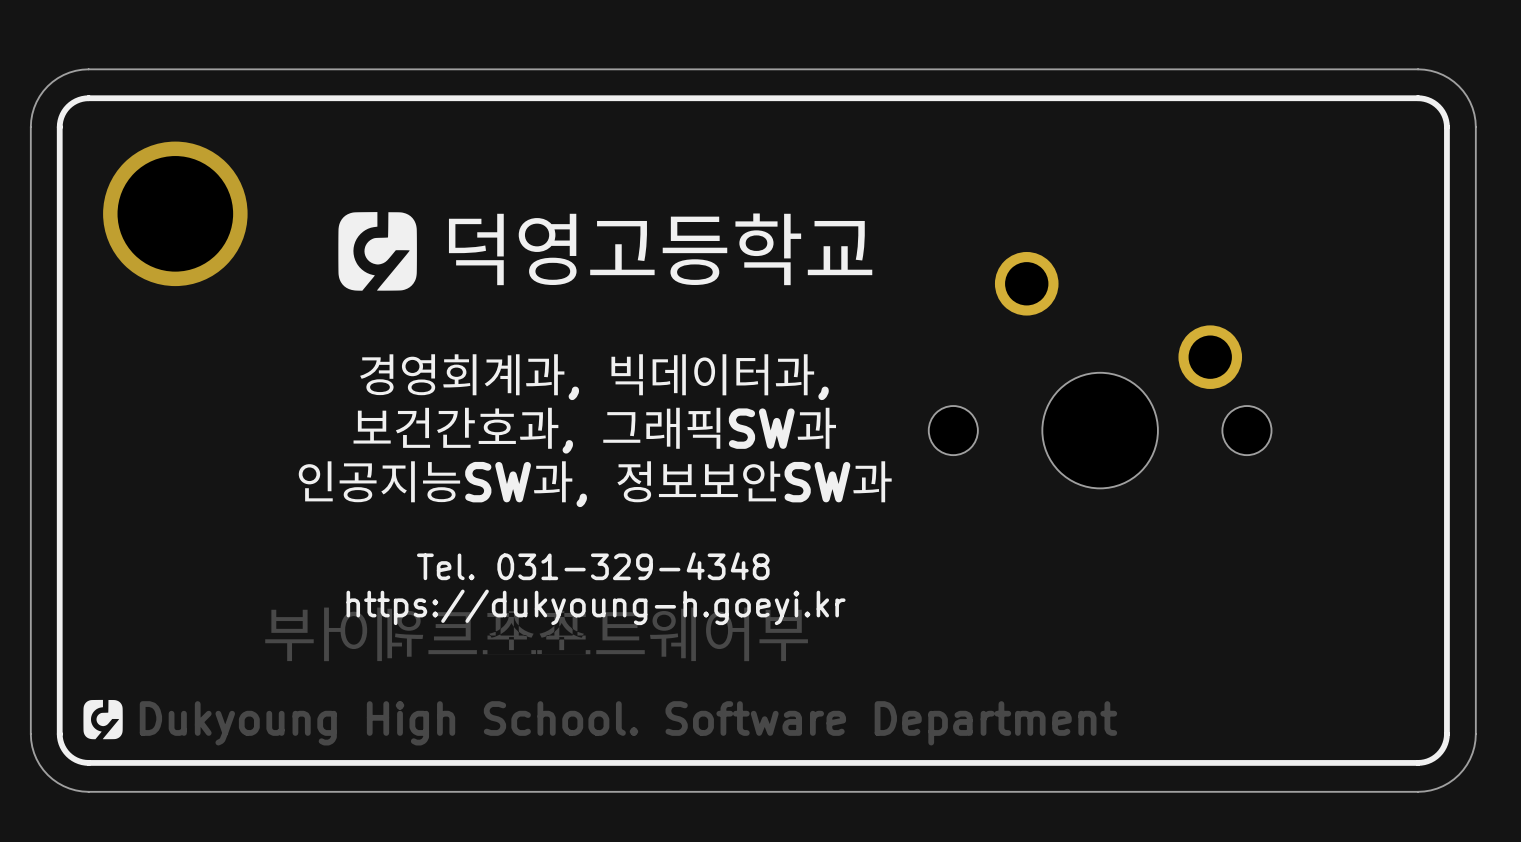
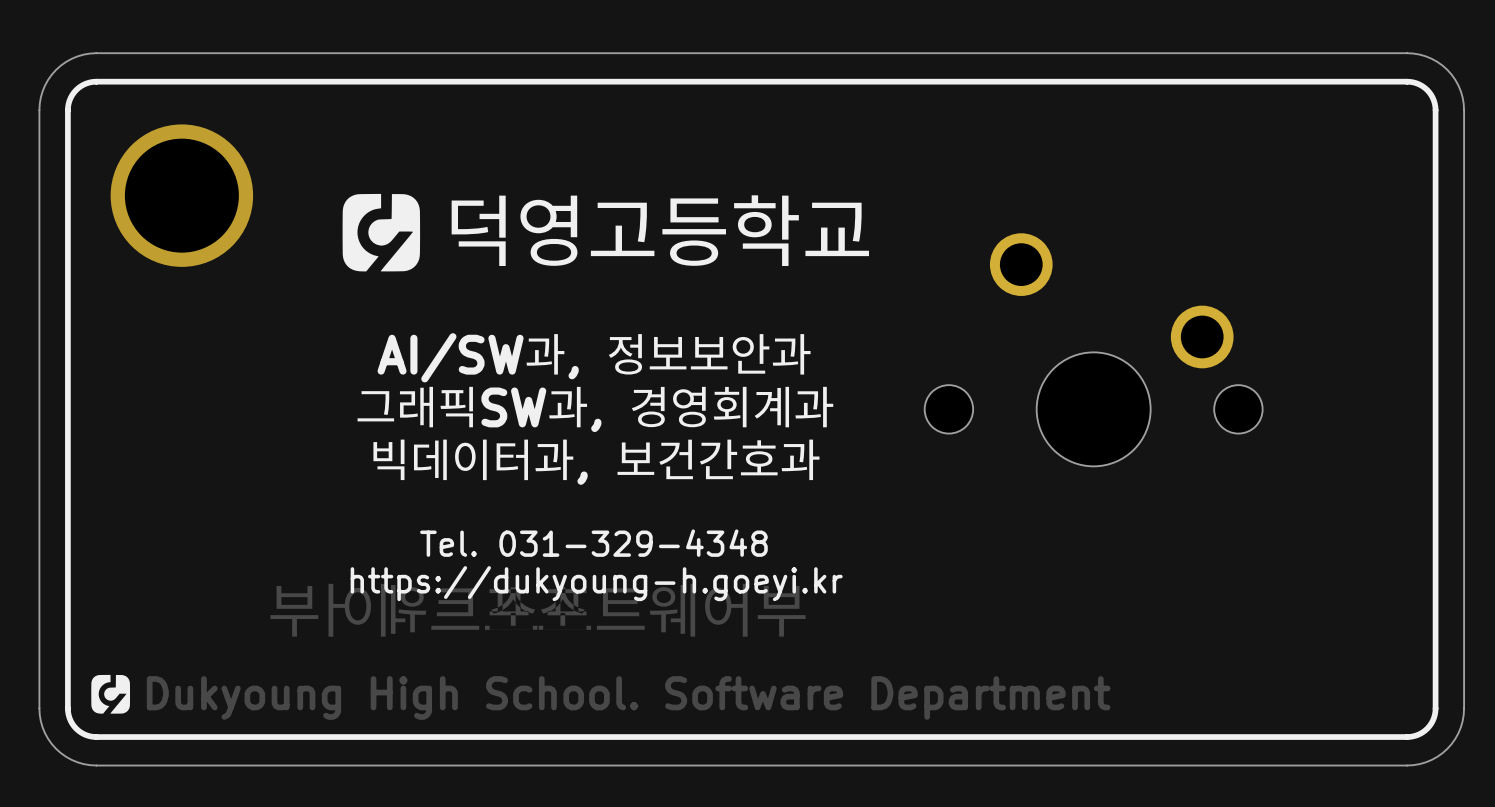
text: 경영회계과, 빅데이터과, (592, 375) -> AI/SW과, 정보보안과 (595, 356)
text: 보건간호과, 그래픽SW과 (594, 428) -> 그래픽SW과, 경영회계과 (595, 407)
text: 인공지능SW과, 정보보안SW과 (595, 482) -> 빅데이터과, 보건간호과 (596, 460)

